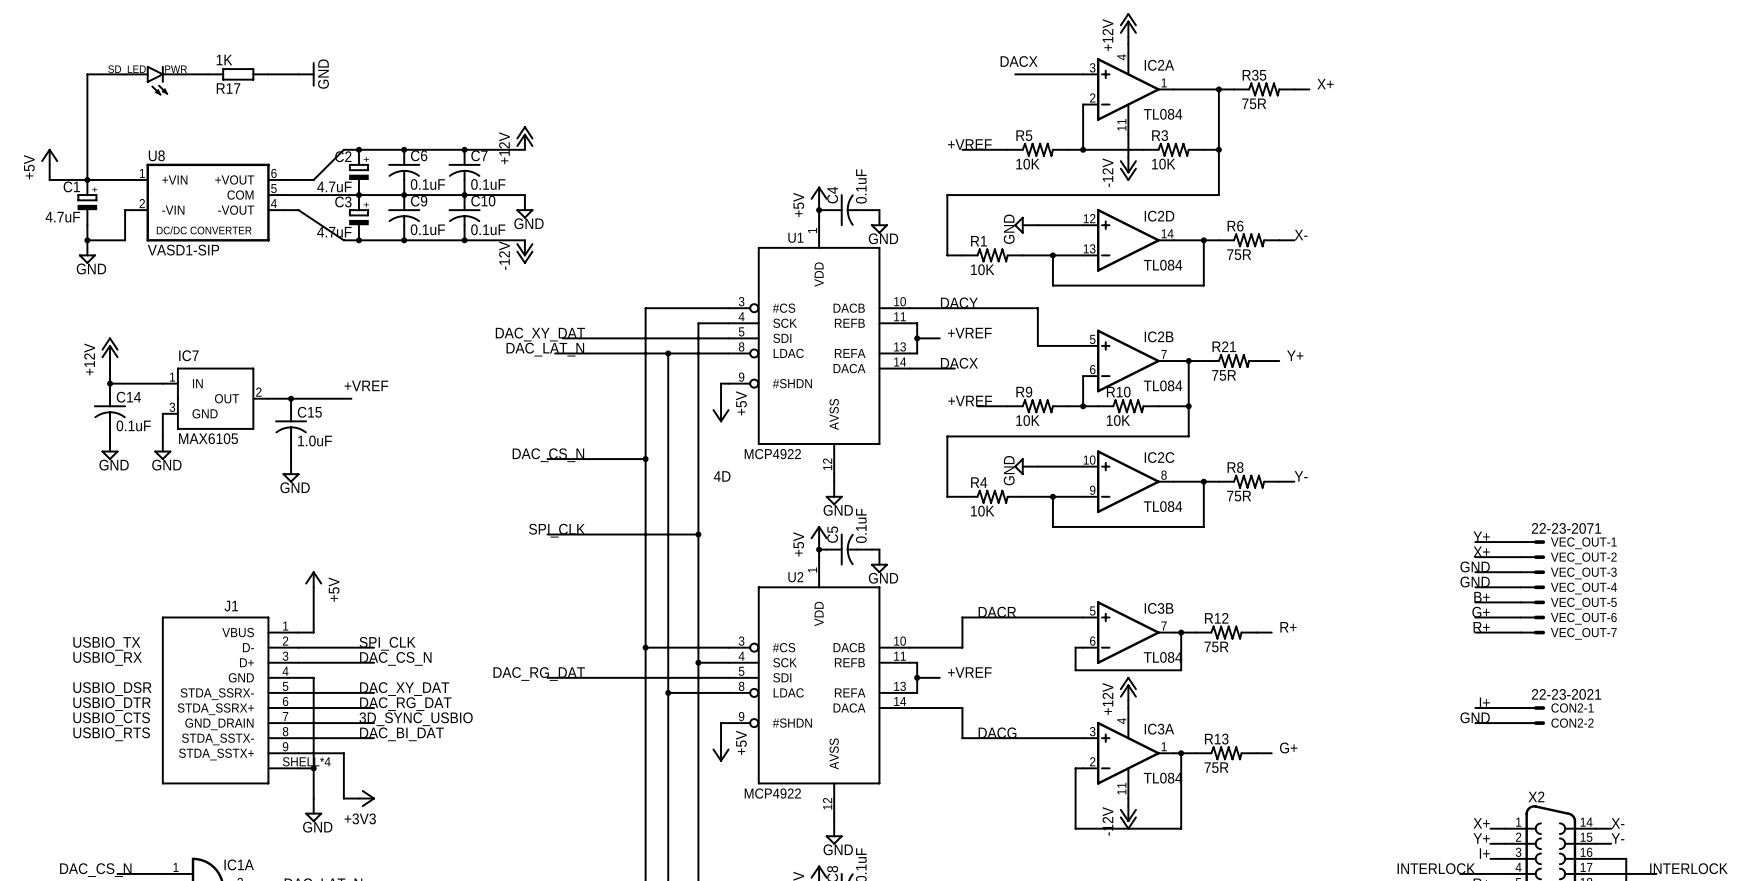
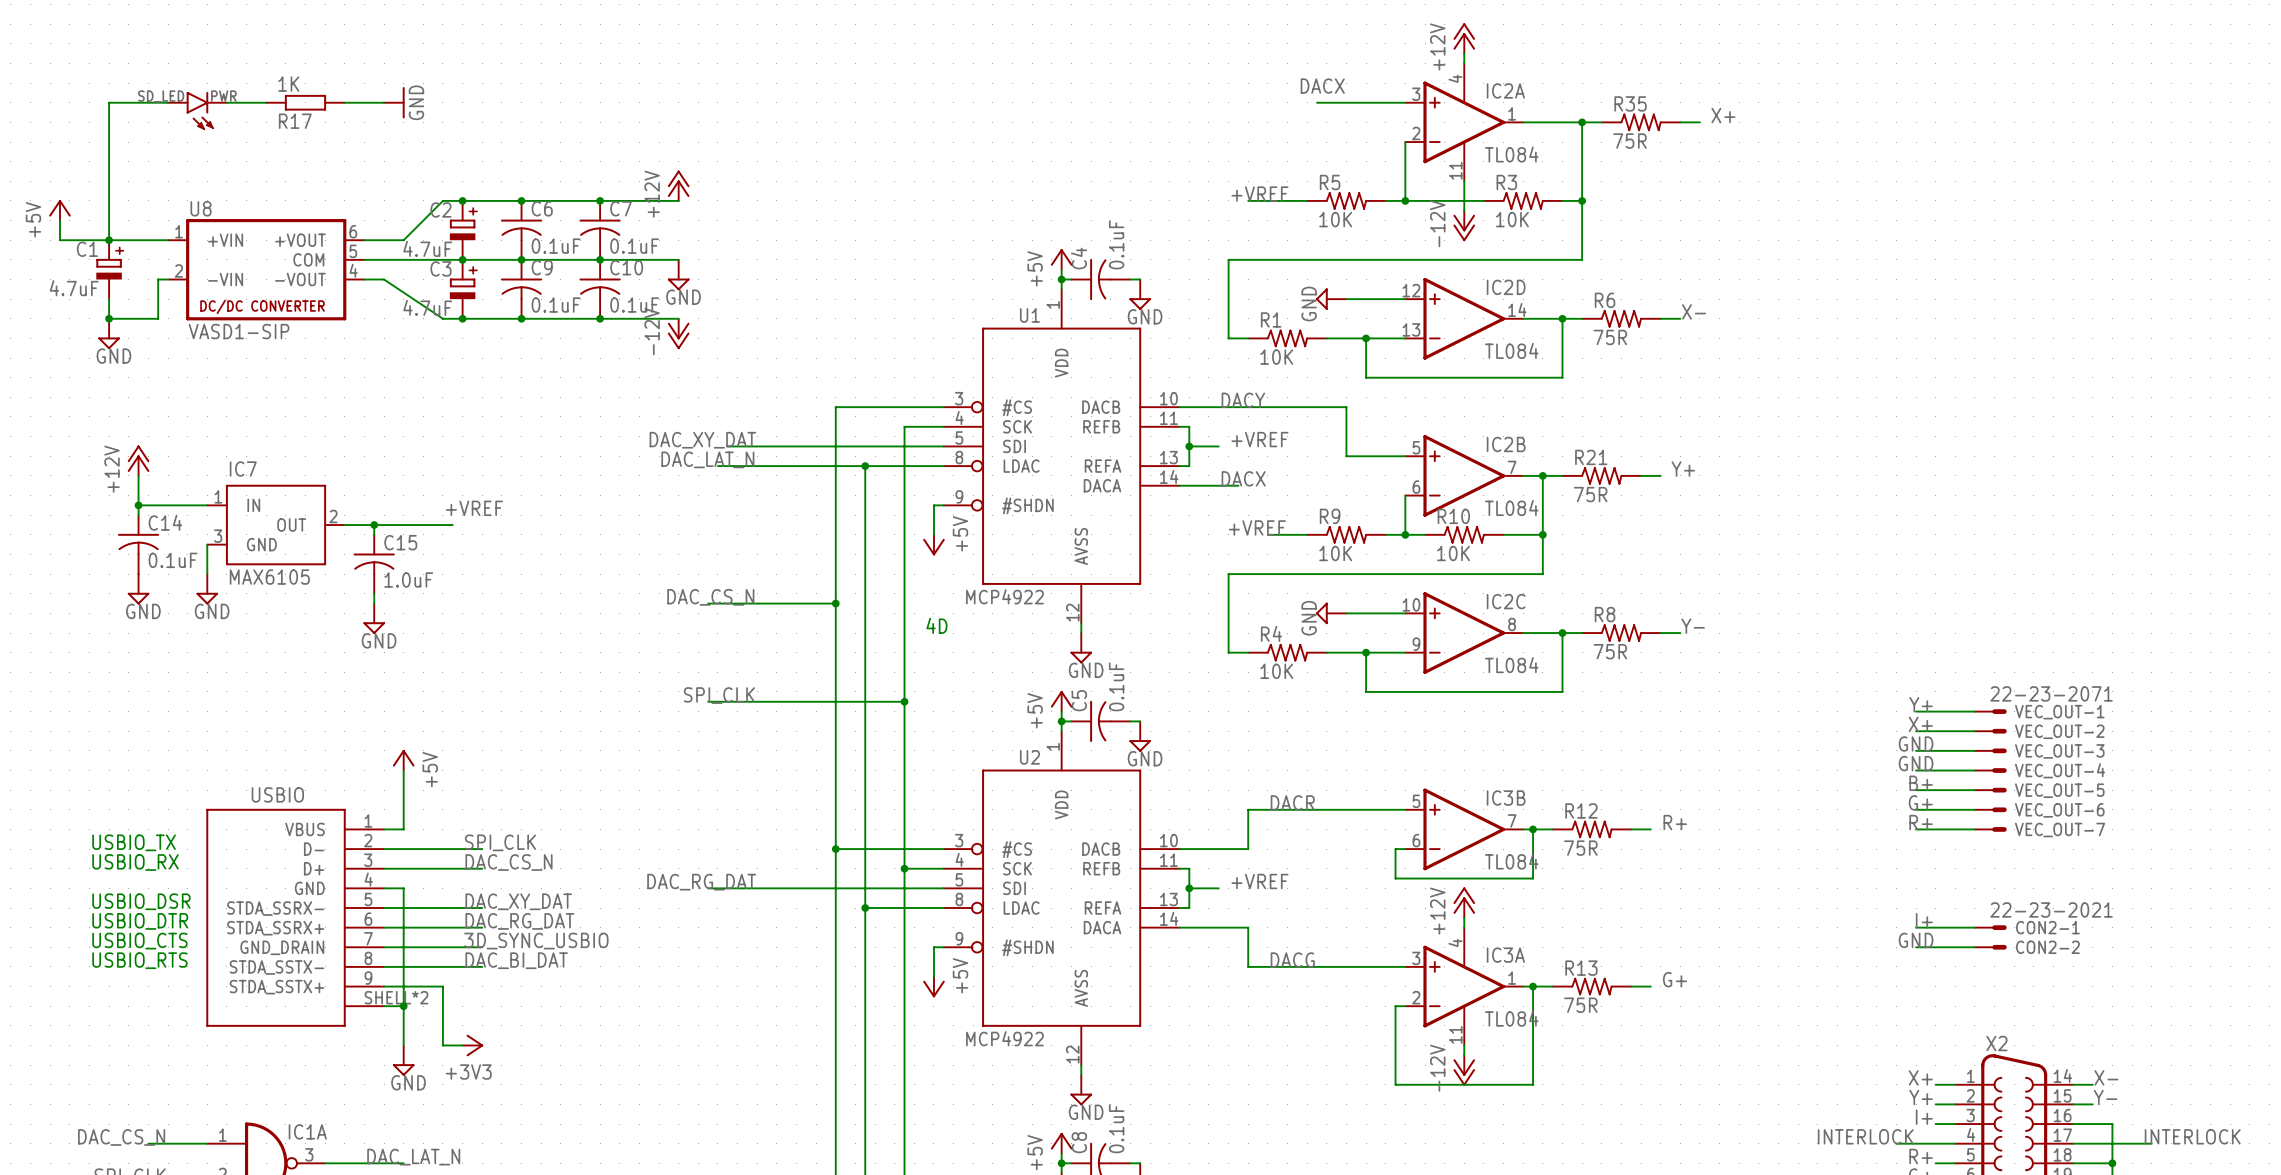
J1 name: J1 (231, 606) -> USBIO (277, 794)
J1 pin number: SHELL*4 (306, 761) -> SHELL*2 (396, 997)

